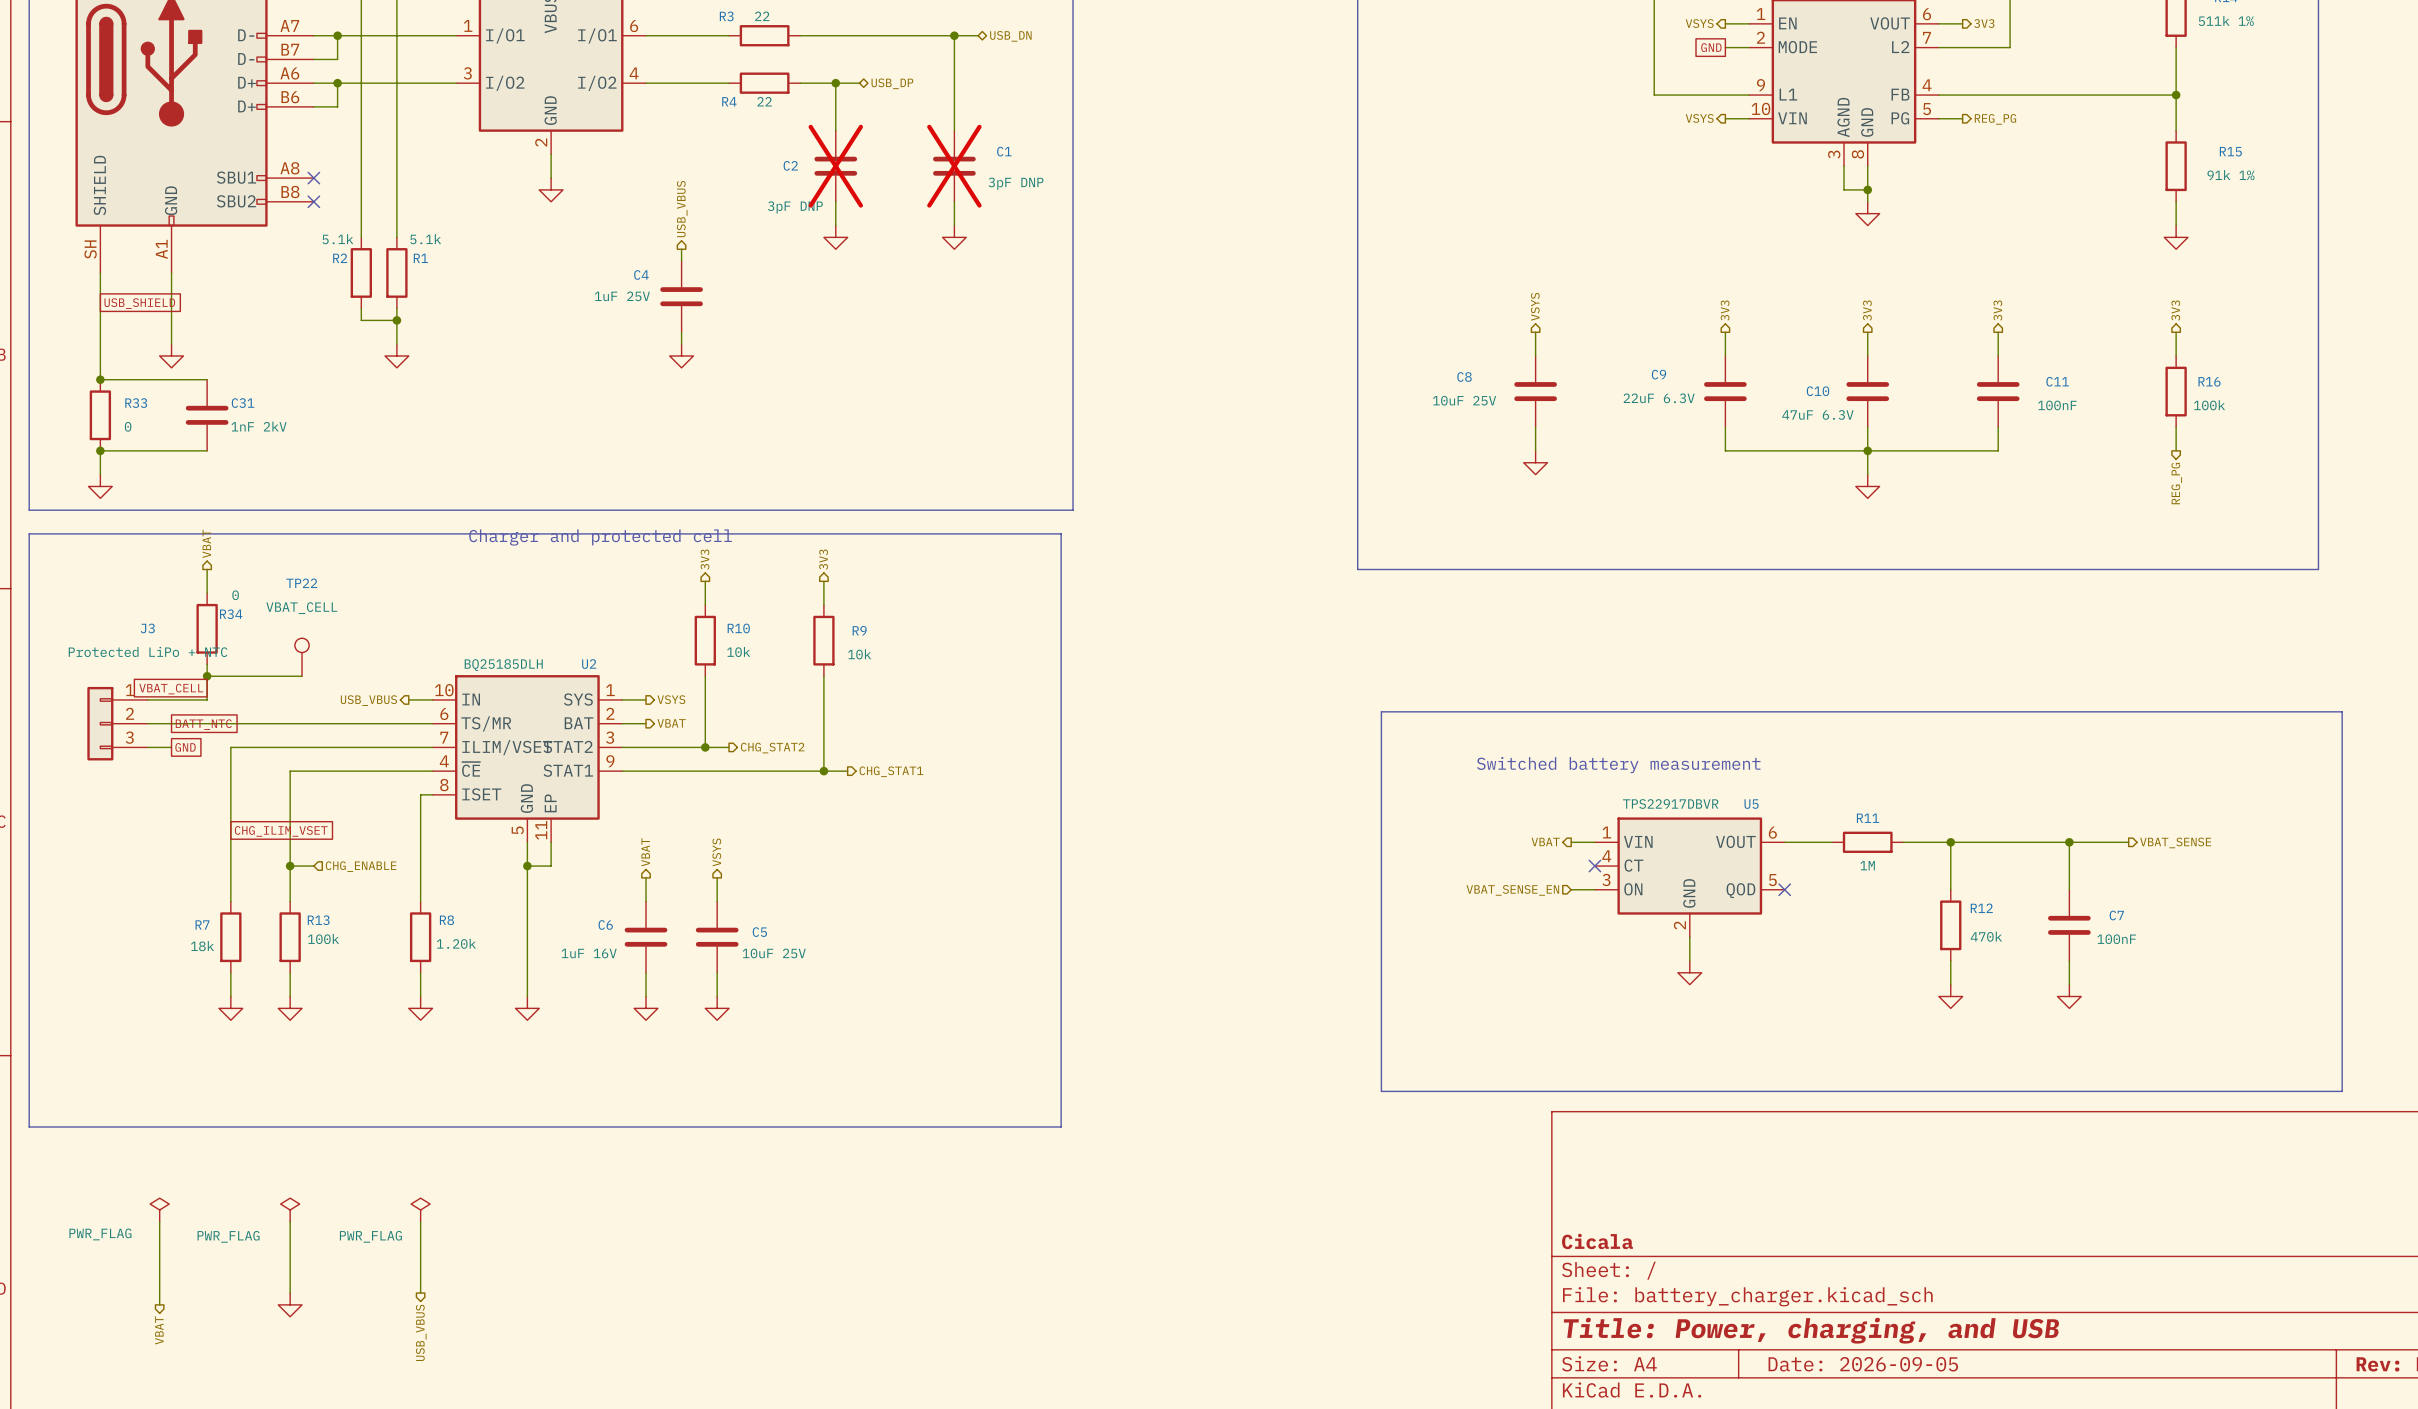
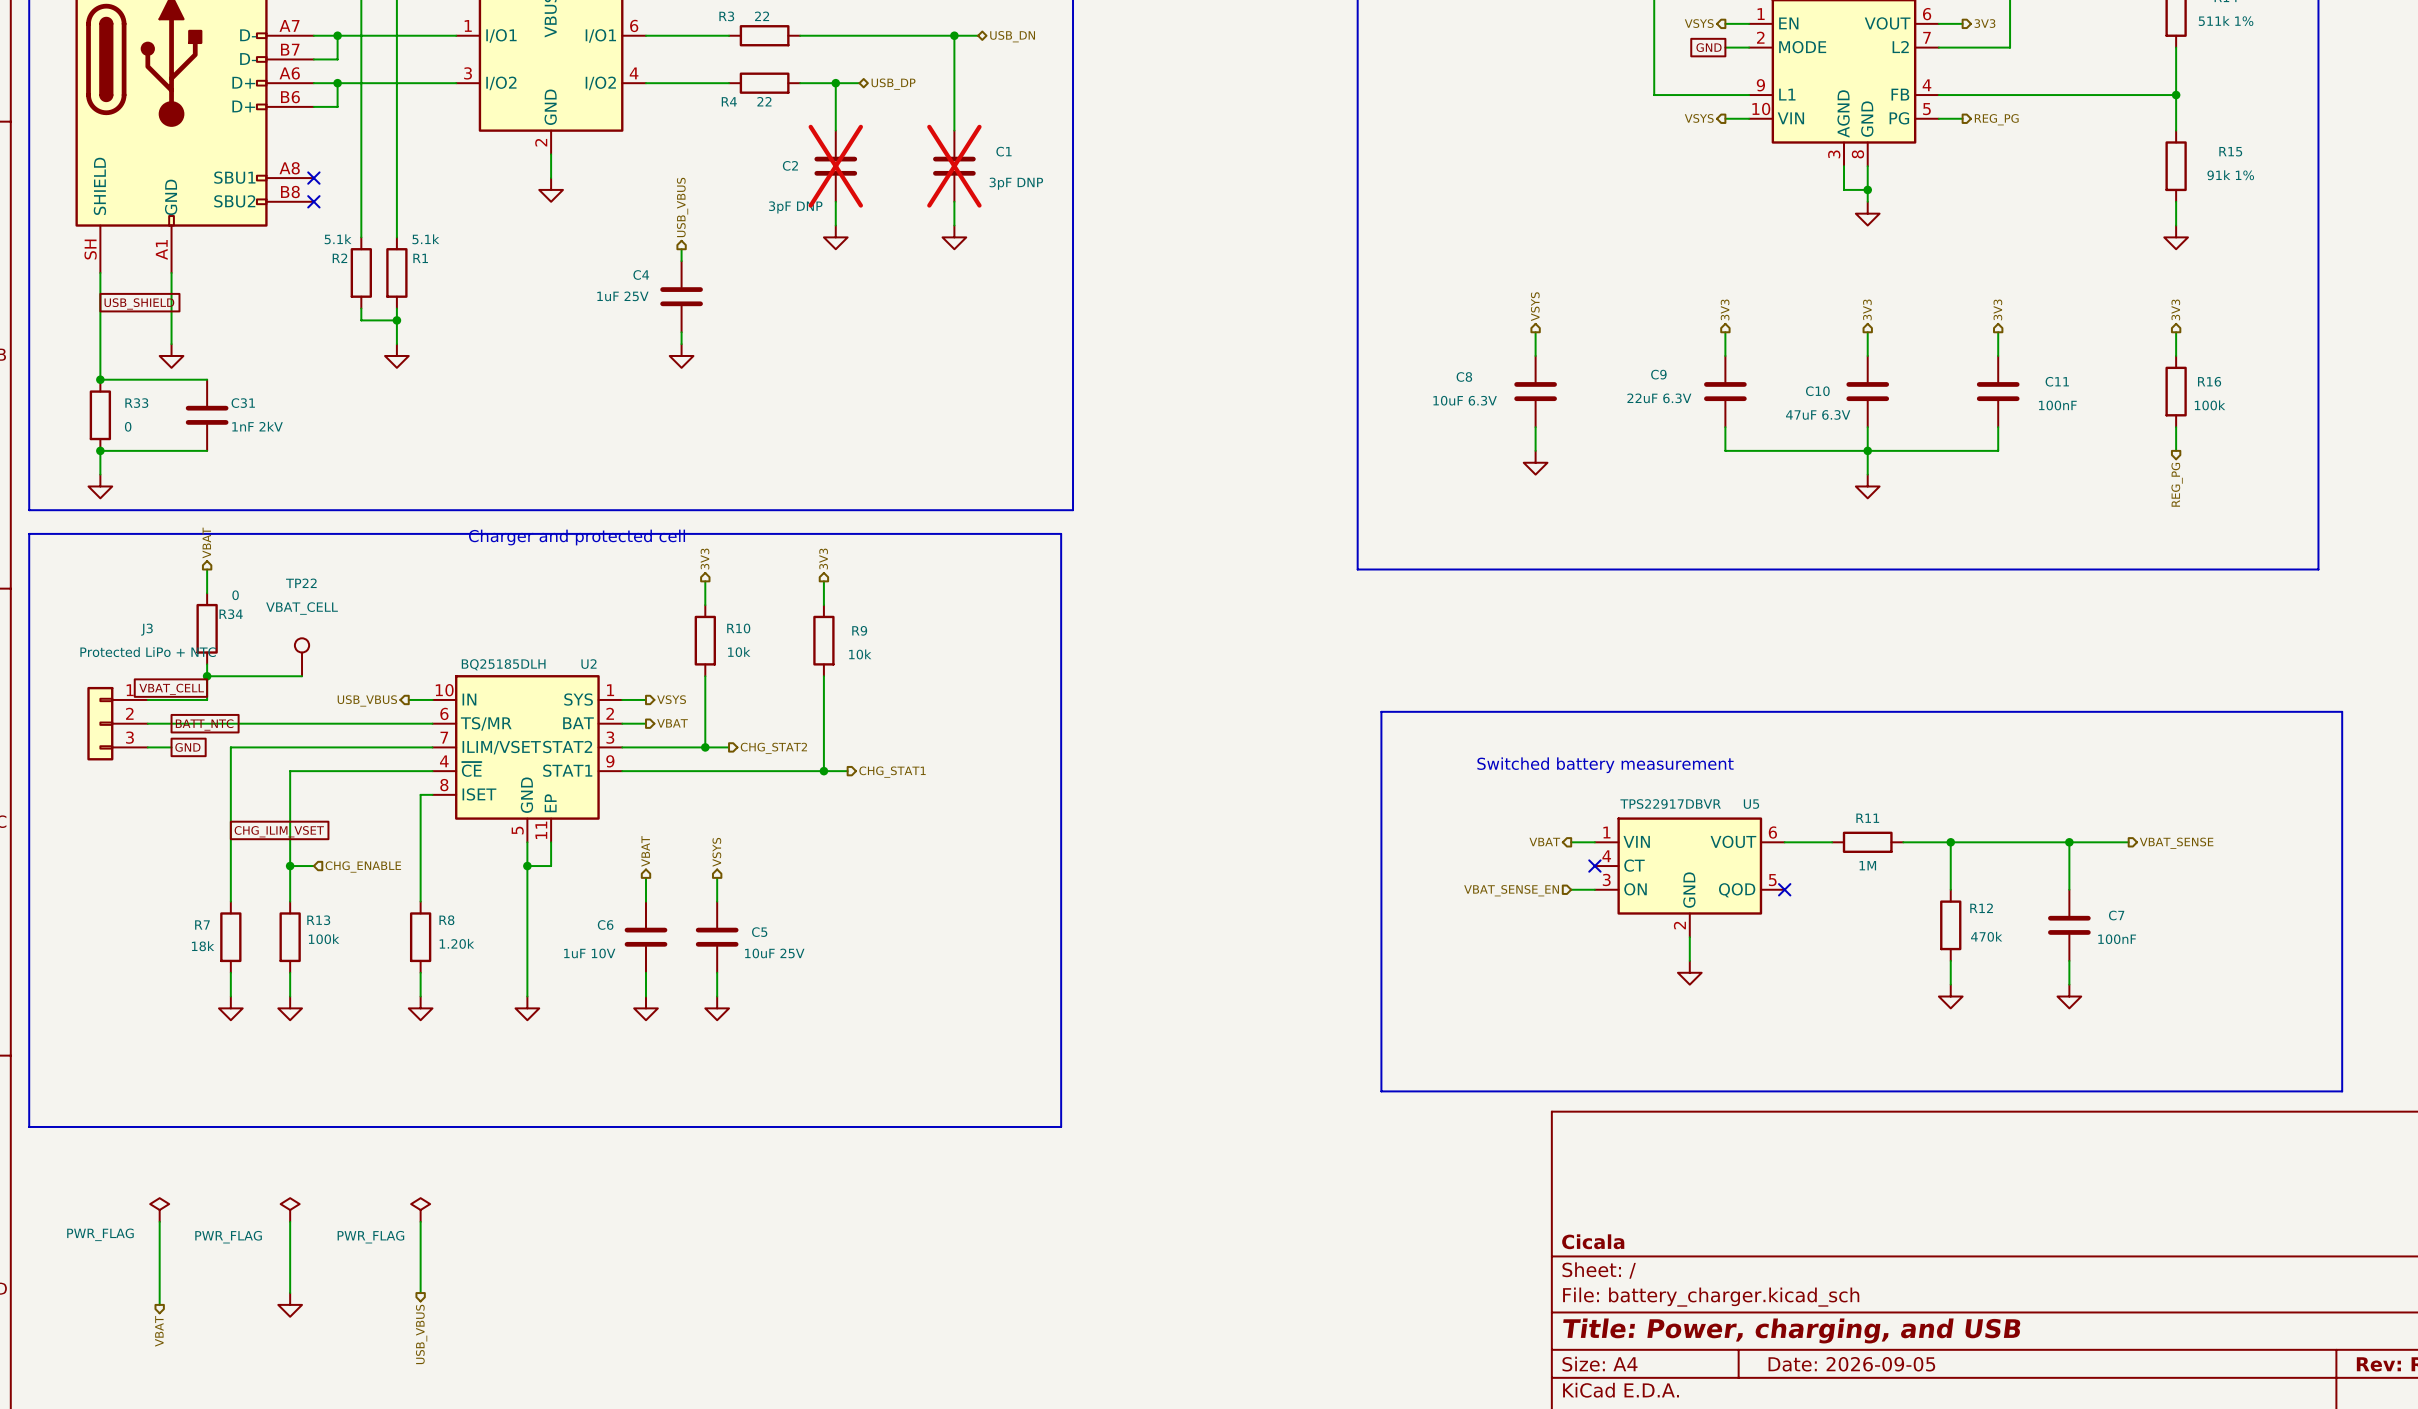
C8 value: 10uF 25V (1464, 400) -> 10uF 6.3V (1465, 400)
C6 value: 1uF 16V (589, 953) -> 1uF 10V (589, 953)

